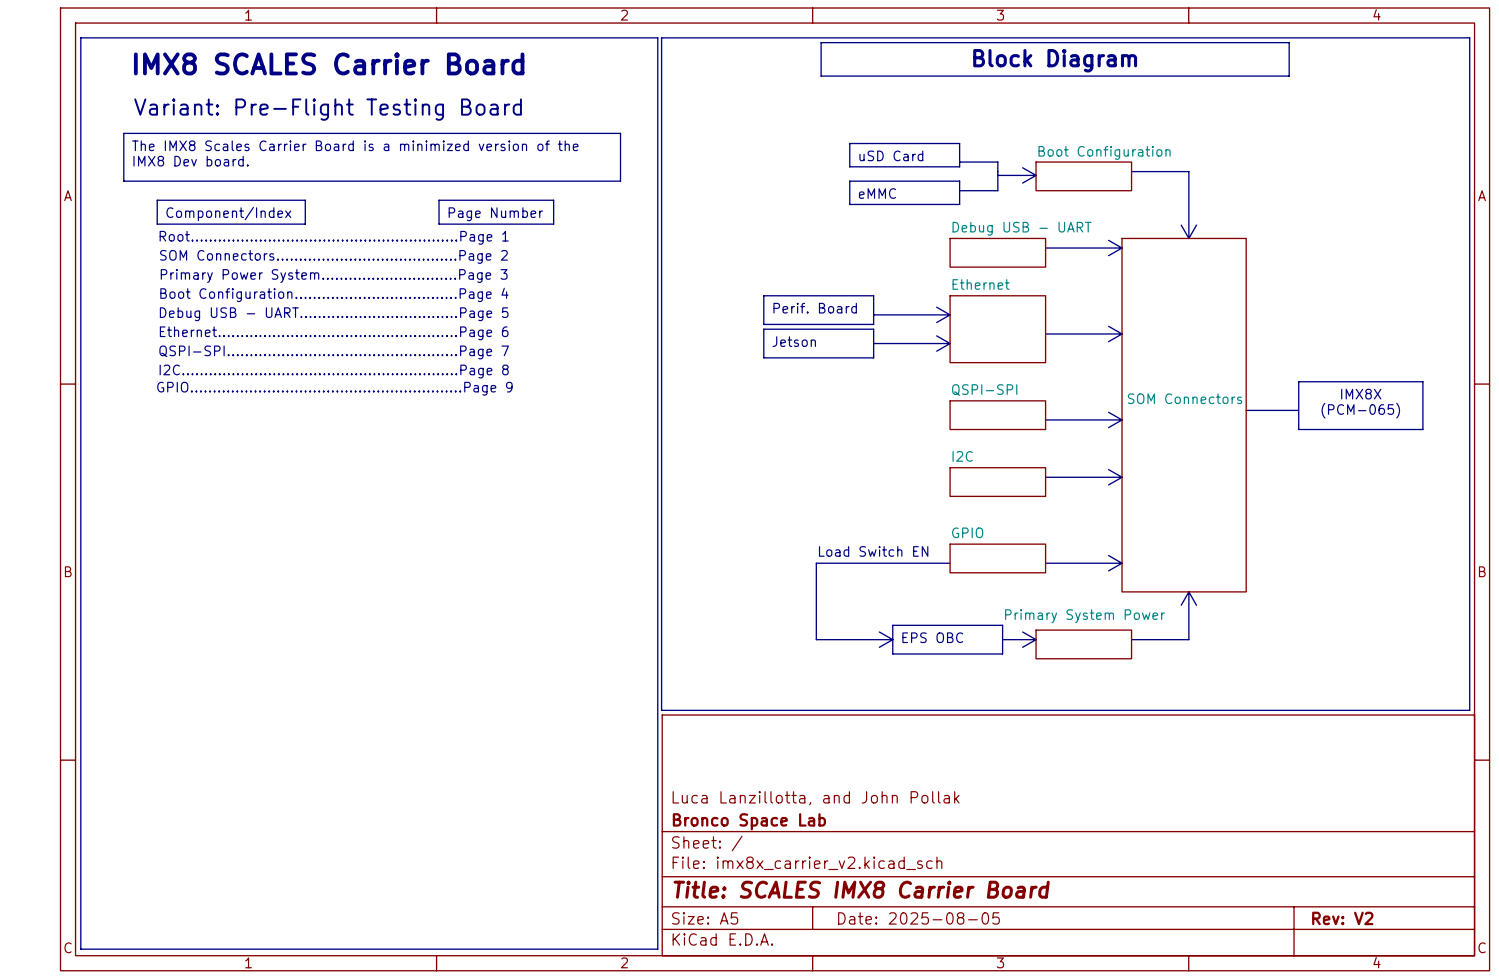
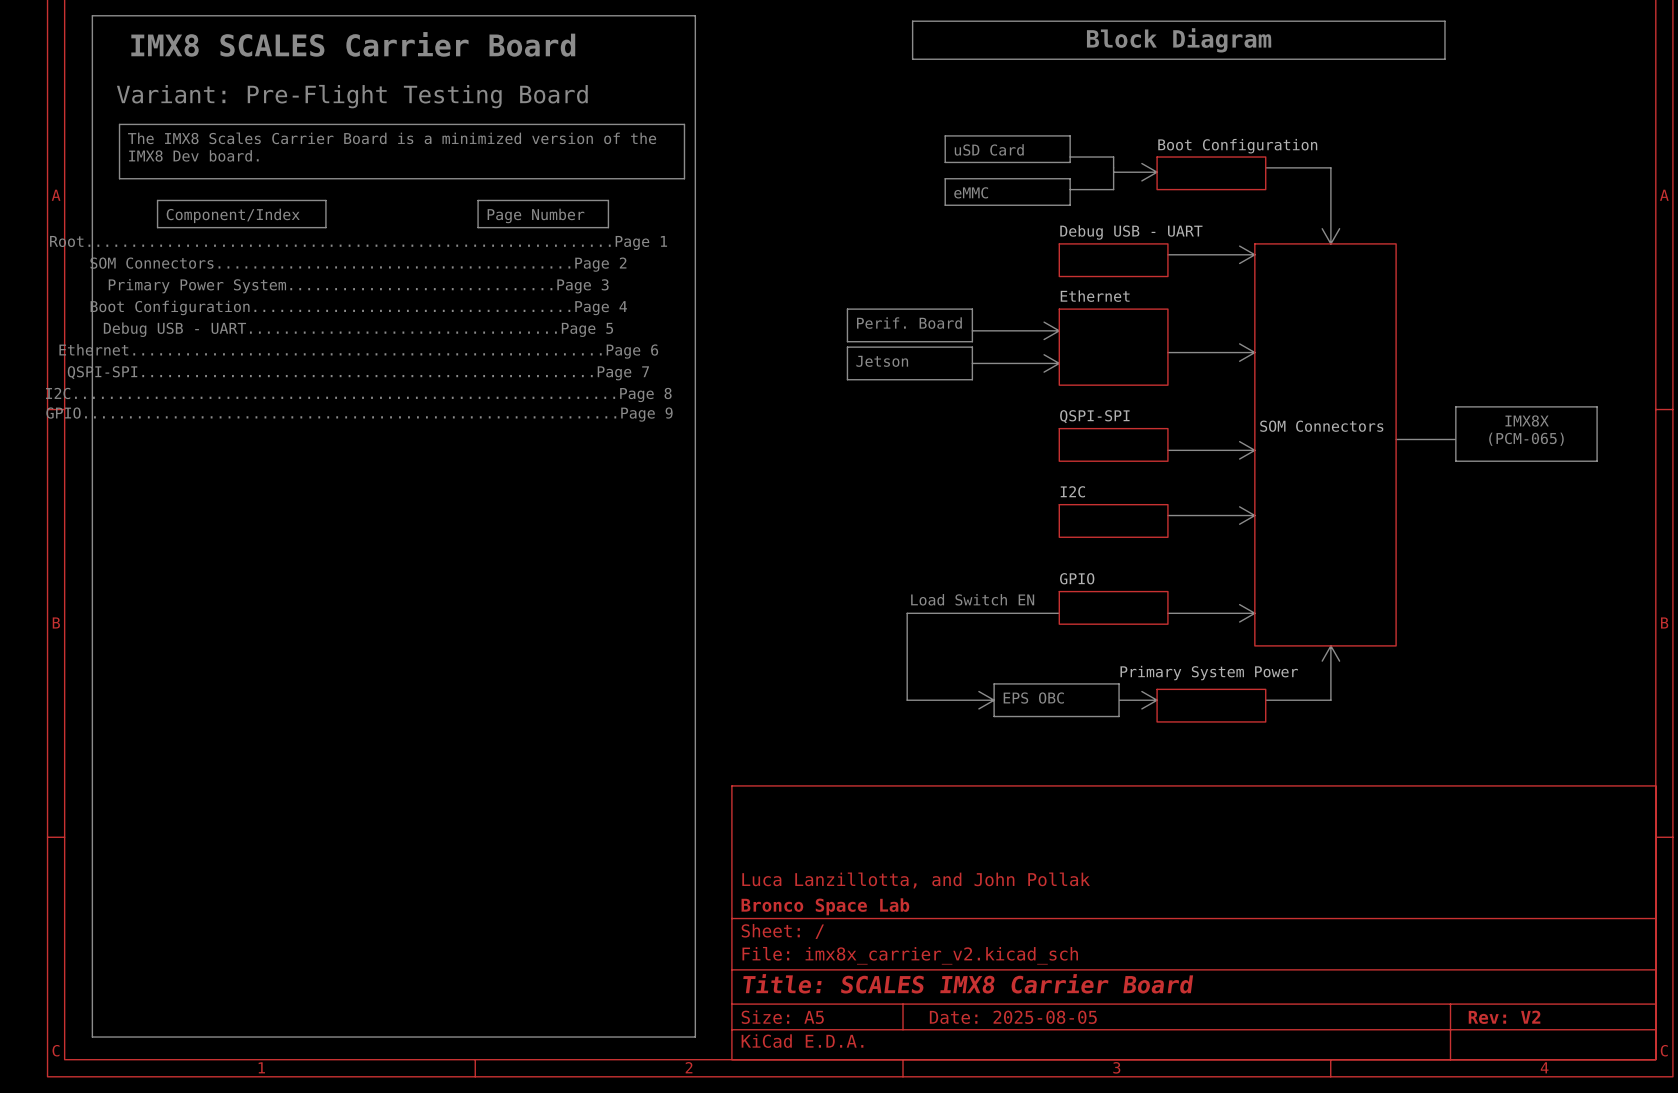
line: (99, 37) (80, 37) (80, 949) (657, 949) (657, 37) (630, 37) -> (92, 15) (92, 1037) (695, 1037) (695, 15)
line: (661, 37) (1469, 37) (1469, 710) (661, 710) (661, 37) -> none

